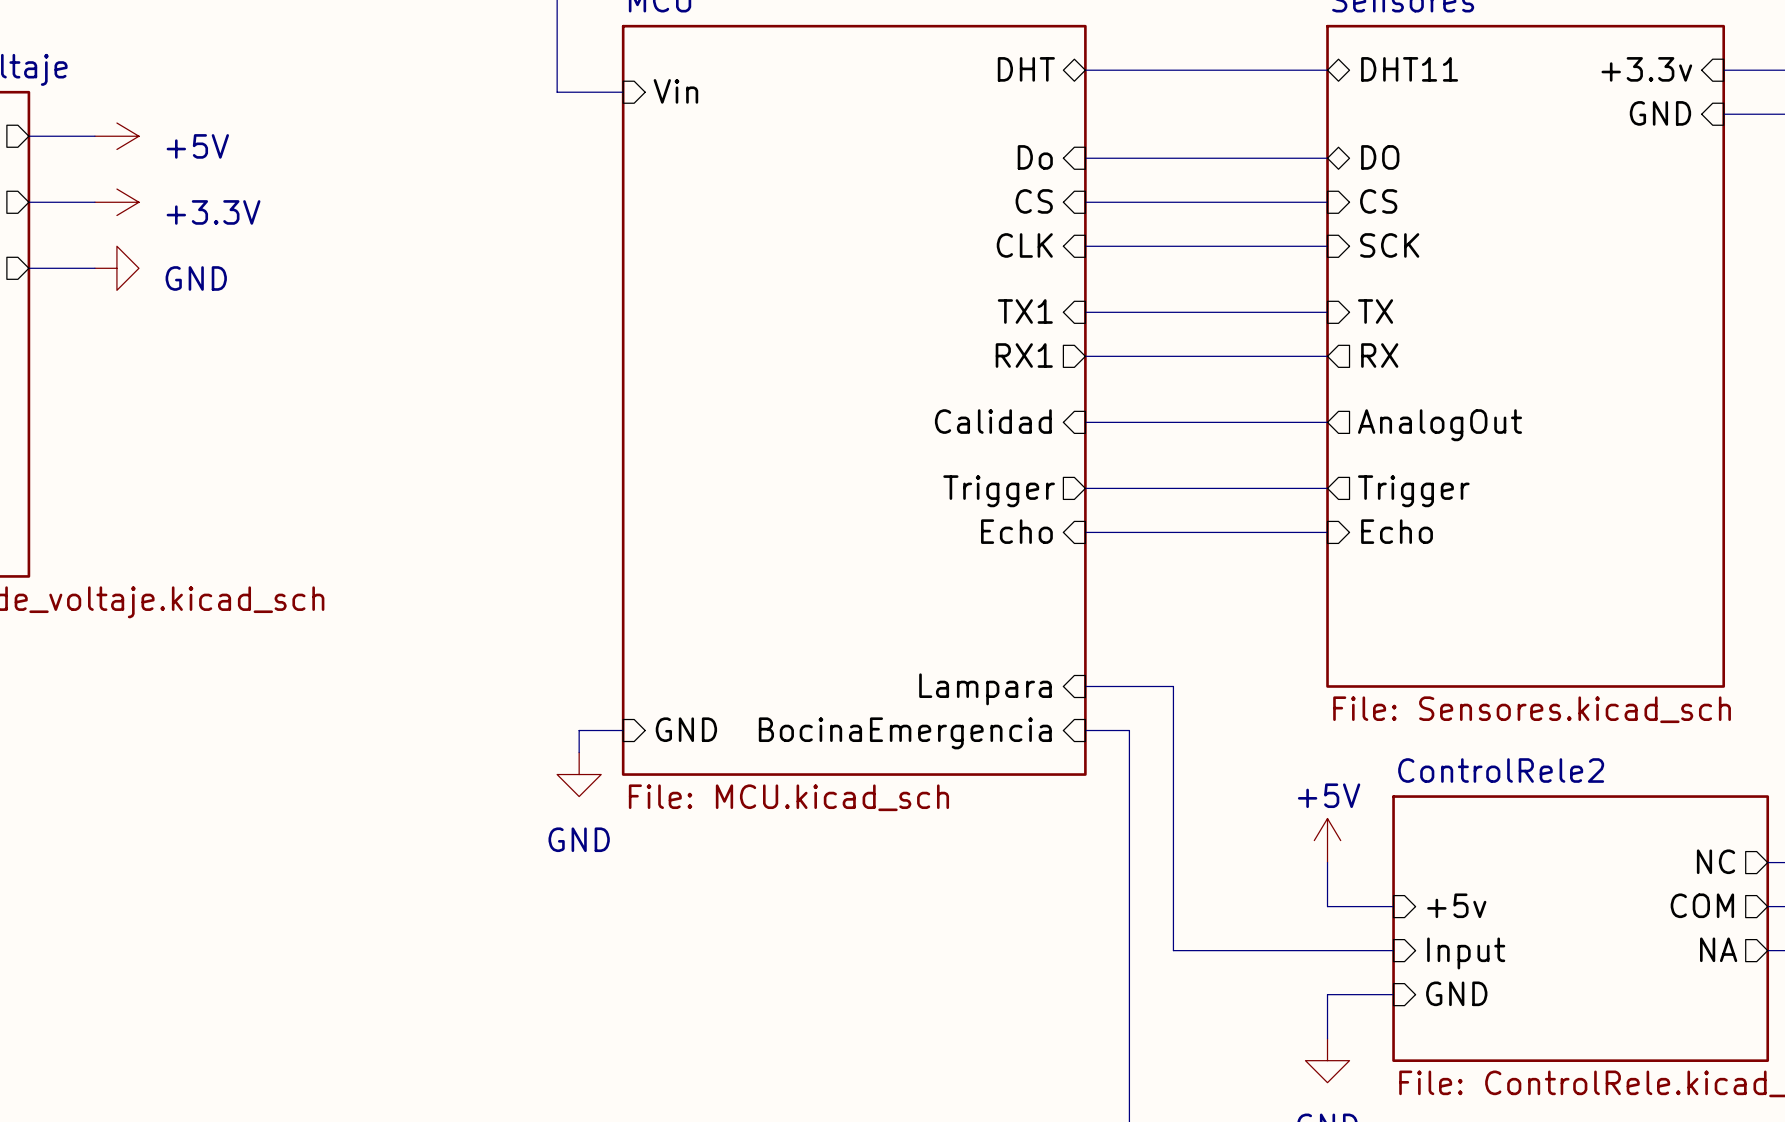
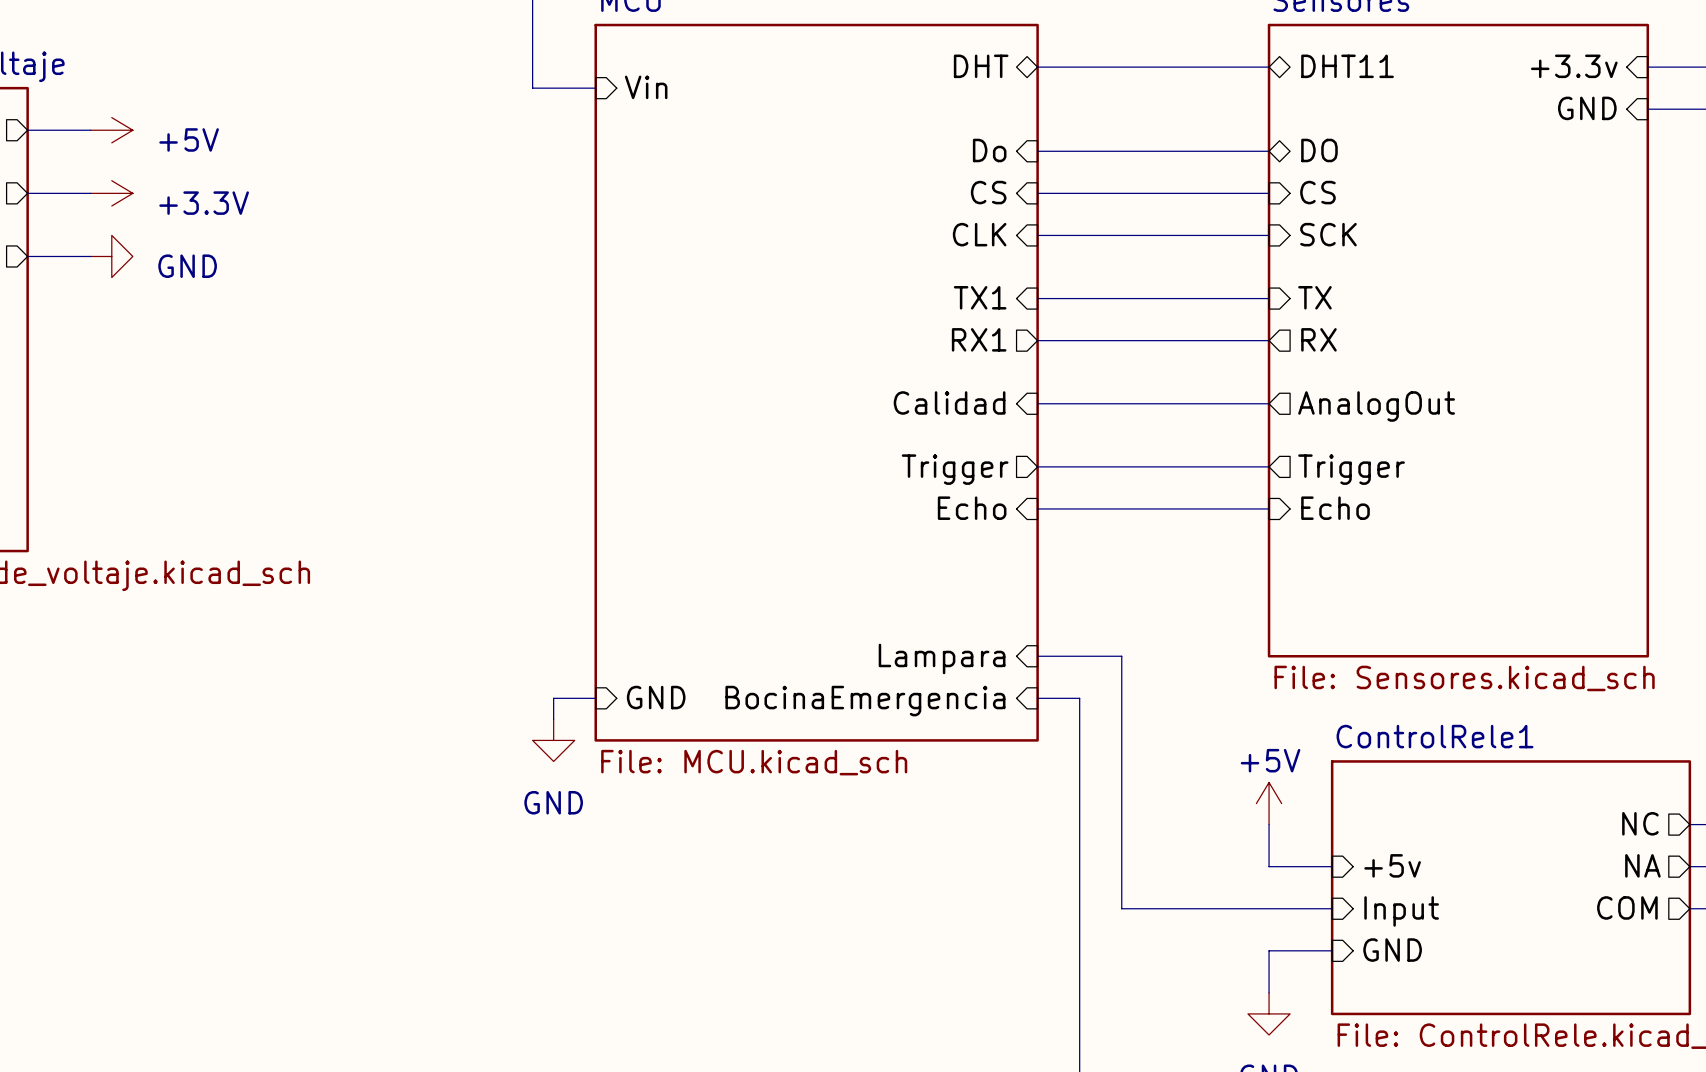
sheet ControlRele2 name: ControlRele2 (1501, 770) -> ControlRele1 (1435, 736)
sheet pin: COM (1702, 905) -> NA (1642, 865)
sheet pin: NA (1718, 949) -> COM (1627, 907)

